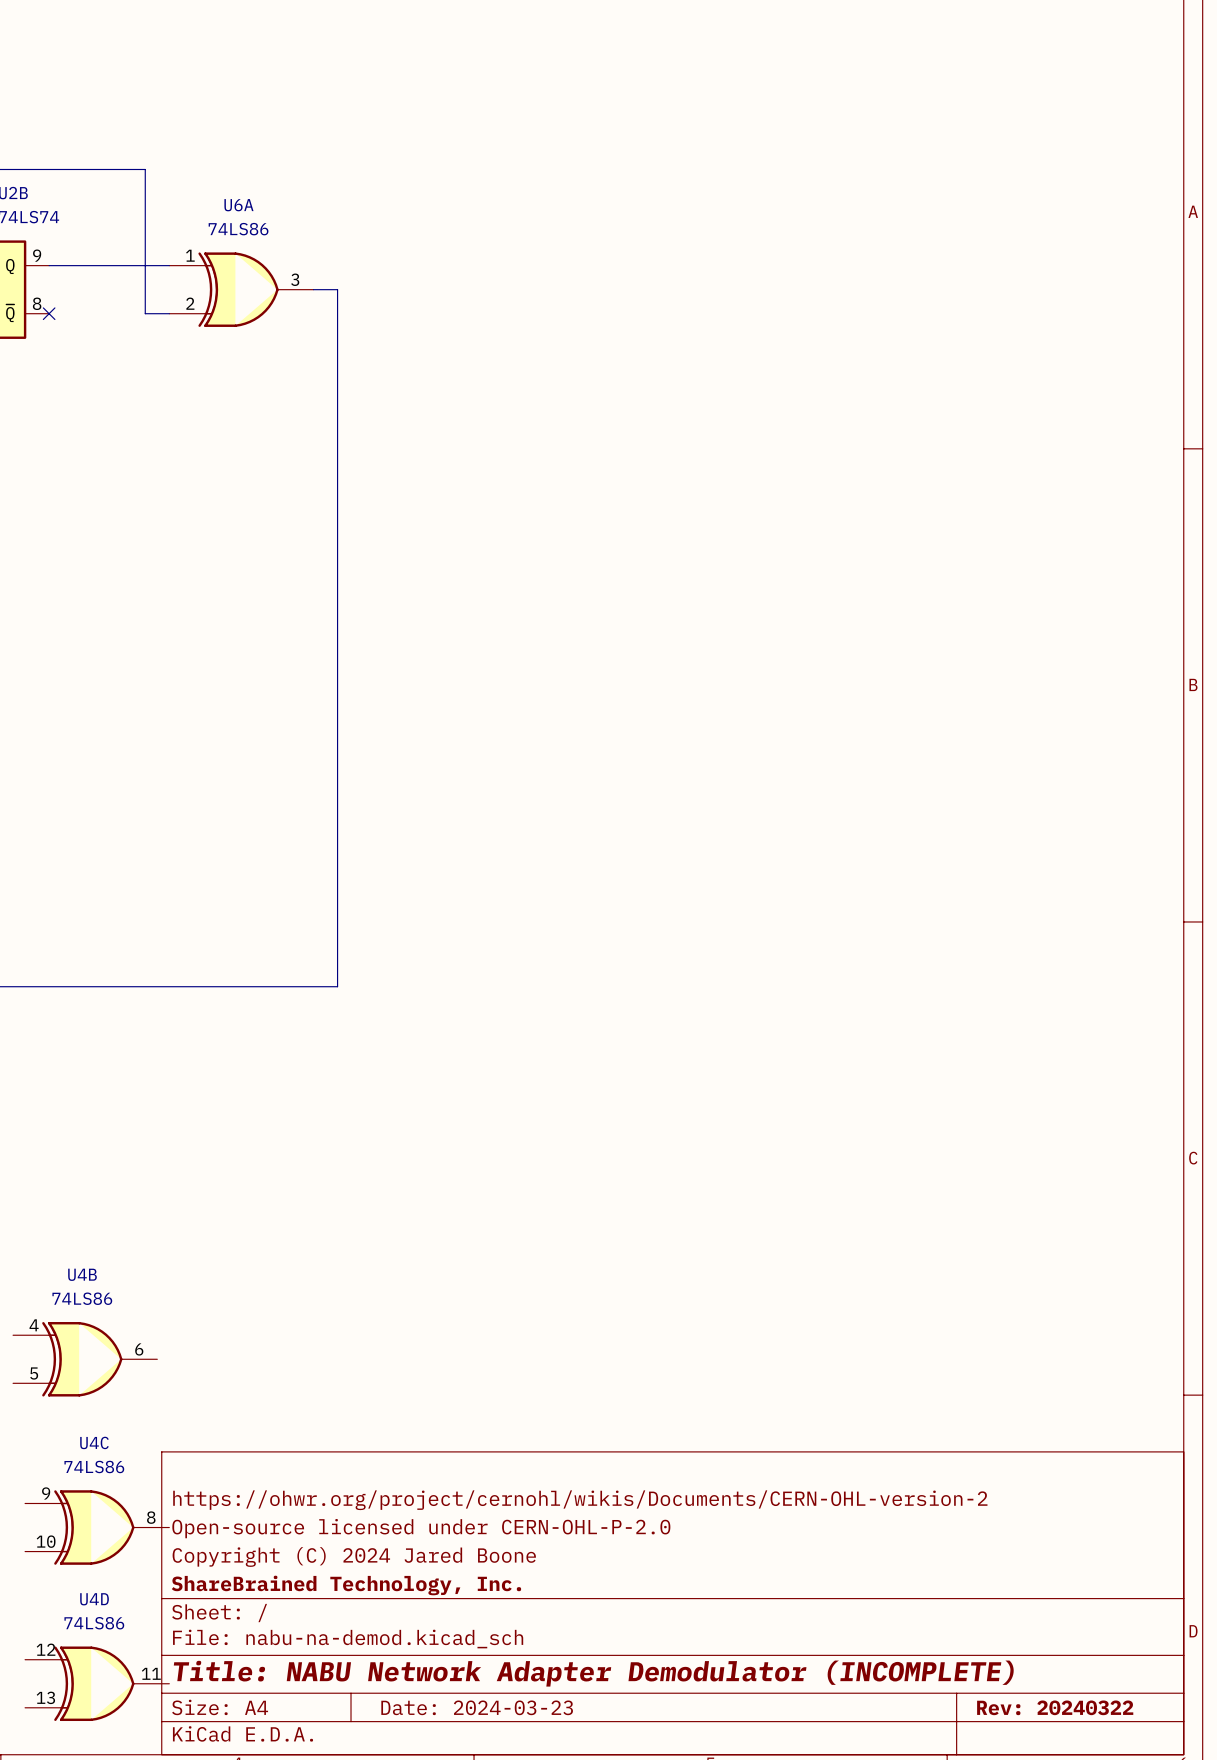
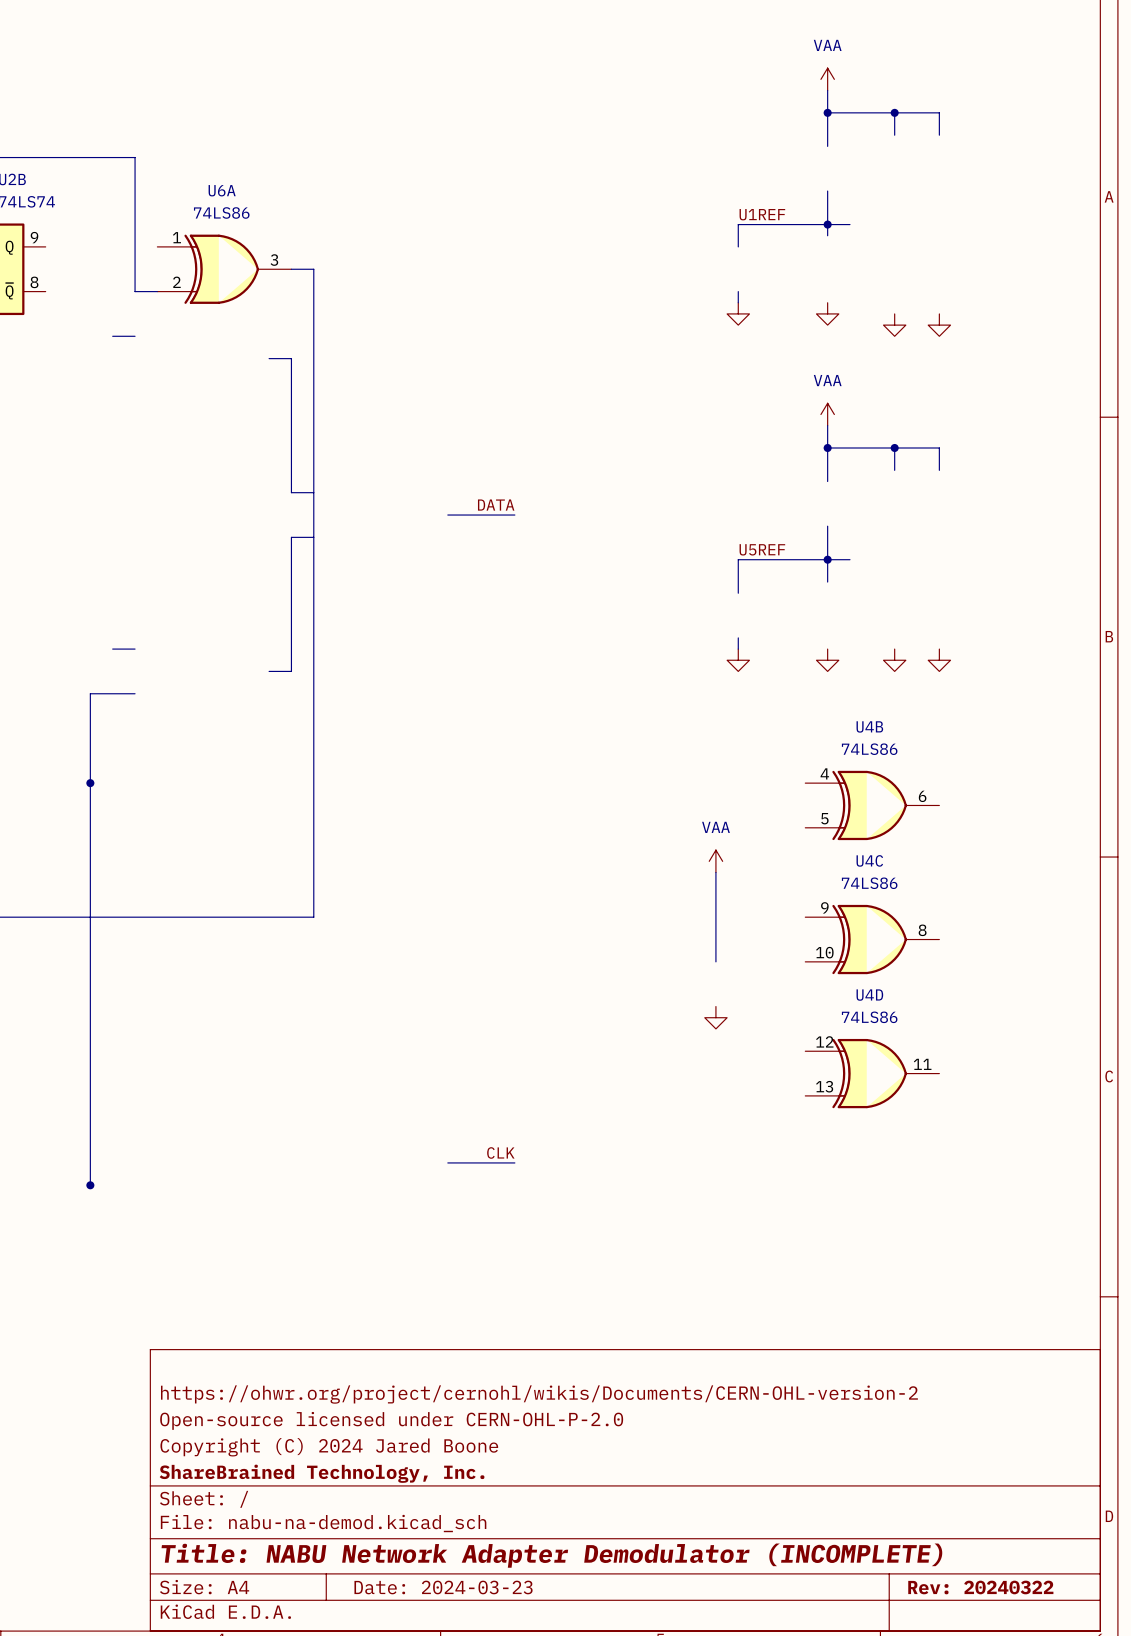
power symbol: none -> VAA (827, 79)
wire: none -> (827, 90) (827, 146)
wire: none -> (827, 112) (939, 112) (939, 135)
junction: none -> (827, 112)
wire: none -> (894, 112) (894, 135)
junction: none -> (894, 112)
wire: none -> (827, 191) (827, 235)
label: none -> U1REF (762, 214)
junction: none -> (827, 224)
wire: none -> (849, 224) (738, 224) (738, 246)
wire: (49, 265) (169, 265) -> none
no-connect mark: (49, 313) -> none
wire: none -> (738, 291) (738, 302)
power symbol: none -> (738, 313)
power symbol: none -> (827, 313)
power symbol: none -> (894, 325)
power symbol: none -> (939, 325)
wire: none -> (112, 336) (135, 336)
wire: none -> (269, 358) (291, 358) (291, 492) (313, 492)
power symbol: none -> VAA (827, 414)
wire: none -> (827, 425) (827, 481)
wire: none -> (827, 447) (939, 447) (939, 470)
junction: none -> (827, 447)
wire: none -> (894, 447) (894, 470)
junction: none -> (894, 447)
label: none -> DATA (496, 505)
wire: none -> (447, 515) (514, 515)
wire: none -> (827, 526) (827, 582)
wire: none -> (313, 537) (291, 537) (291, 671) (269, 671)
label: none -> U5REF (762, 549)
junction: none -> (827, 559)
wire: none -> (849, 559) (738, 559) (738, 593)
wire: none -> (738, 637) (738, 649)
wire: none -> (112, 649) (135, 649)
power symbol: none -> (738, 660)
power symbol: none -> (827, 660)
power symbol: none -> (894, 660)
power symbol: none -> (939, 660)
wire: none -> (135, 693) (90, 693) (90, 1185)
junction: none -> (90, 783)
power symbol: none -> VAA (715, 861)
wire: none -> (715, 872) (715, 961)
power symbol: none -> (715, 1017)
label: none -> CLK (500, 1152)
wire: none -> (447, 1162) (514, 1162)
junction: none -> (90, 1185)
U4B position: (85, 1359) -> (872, 805)
U4C position: (97, 1527) -> (872, 939)
U4D position: (97, 1683) -> (872, 1073)

